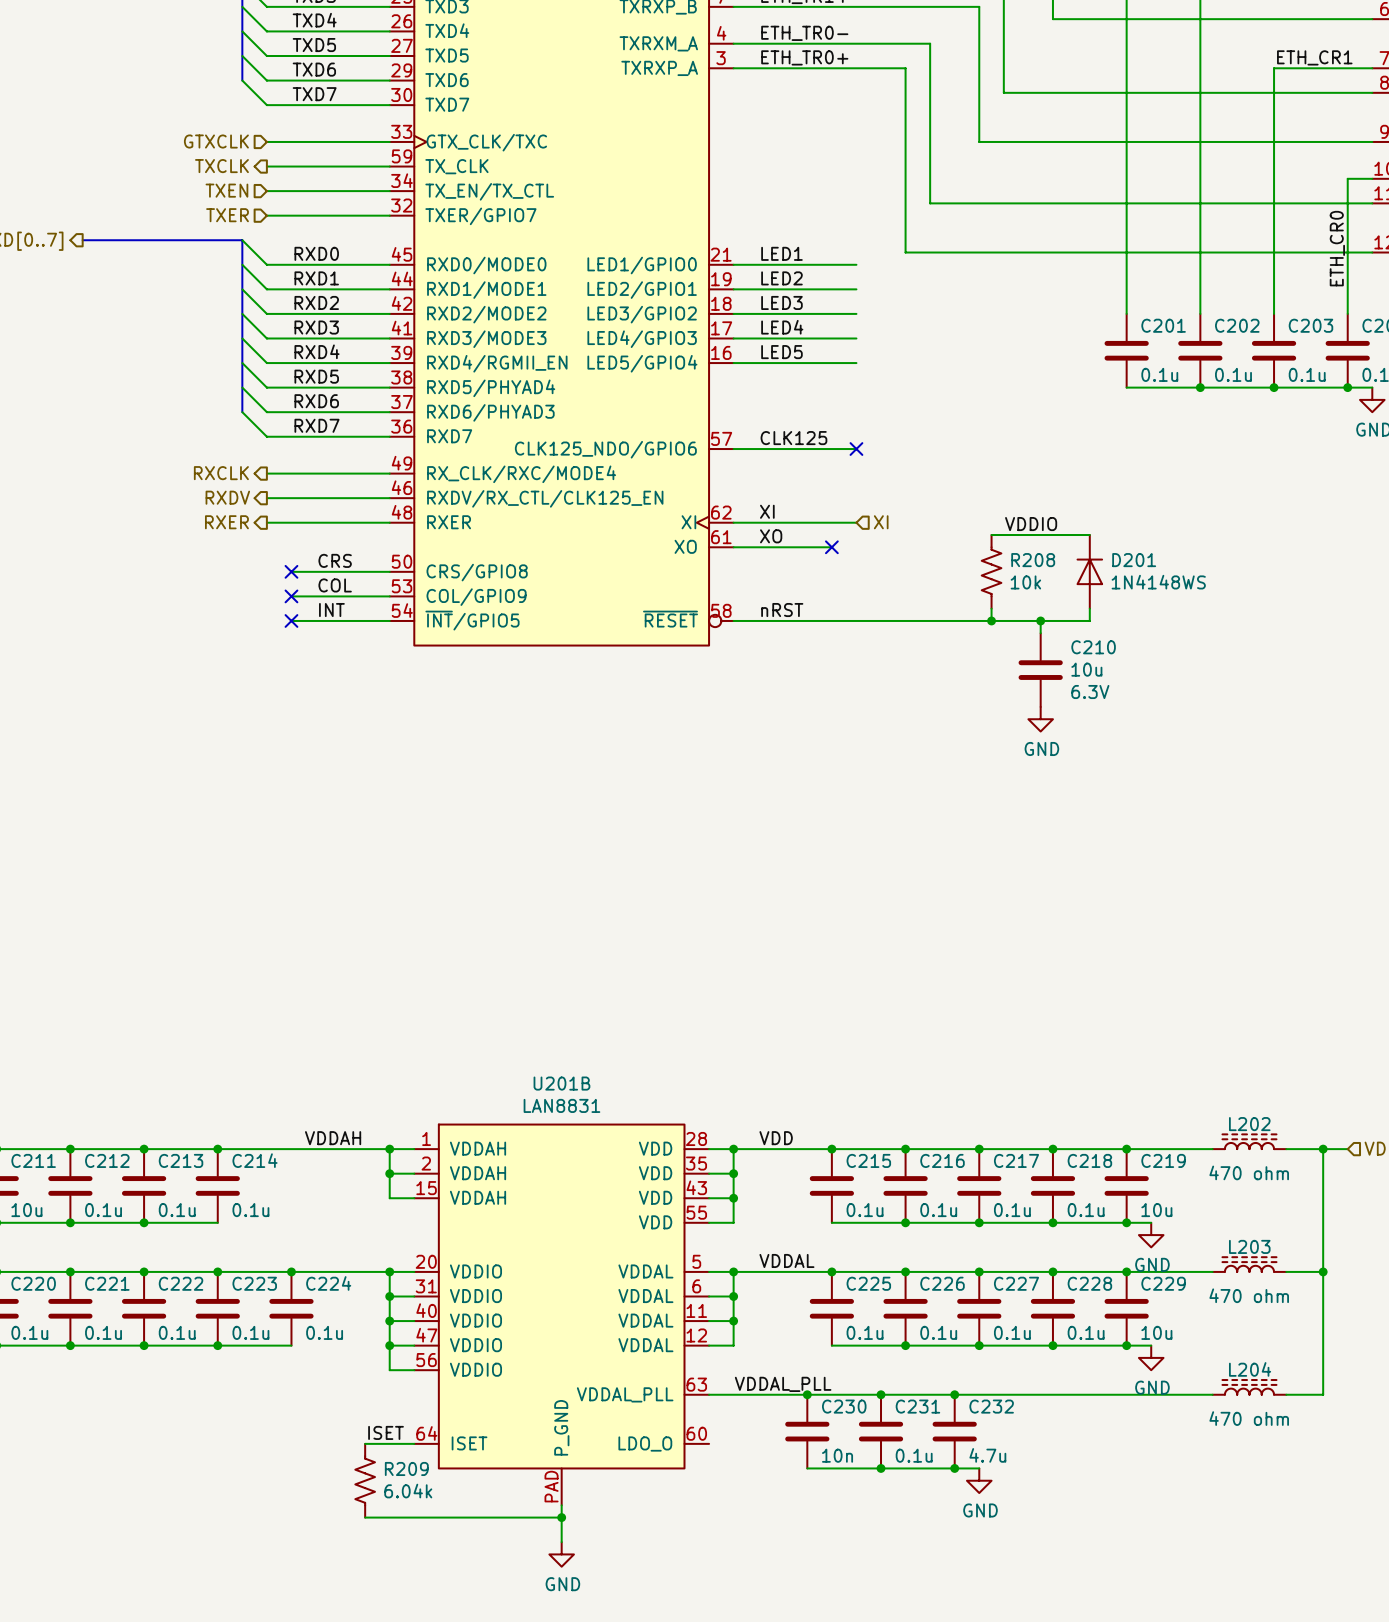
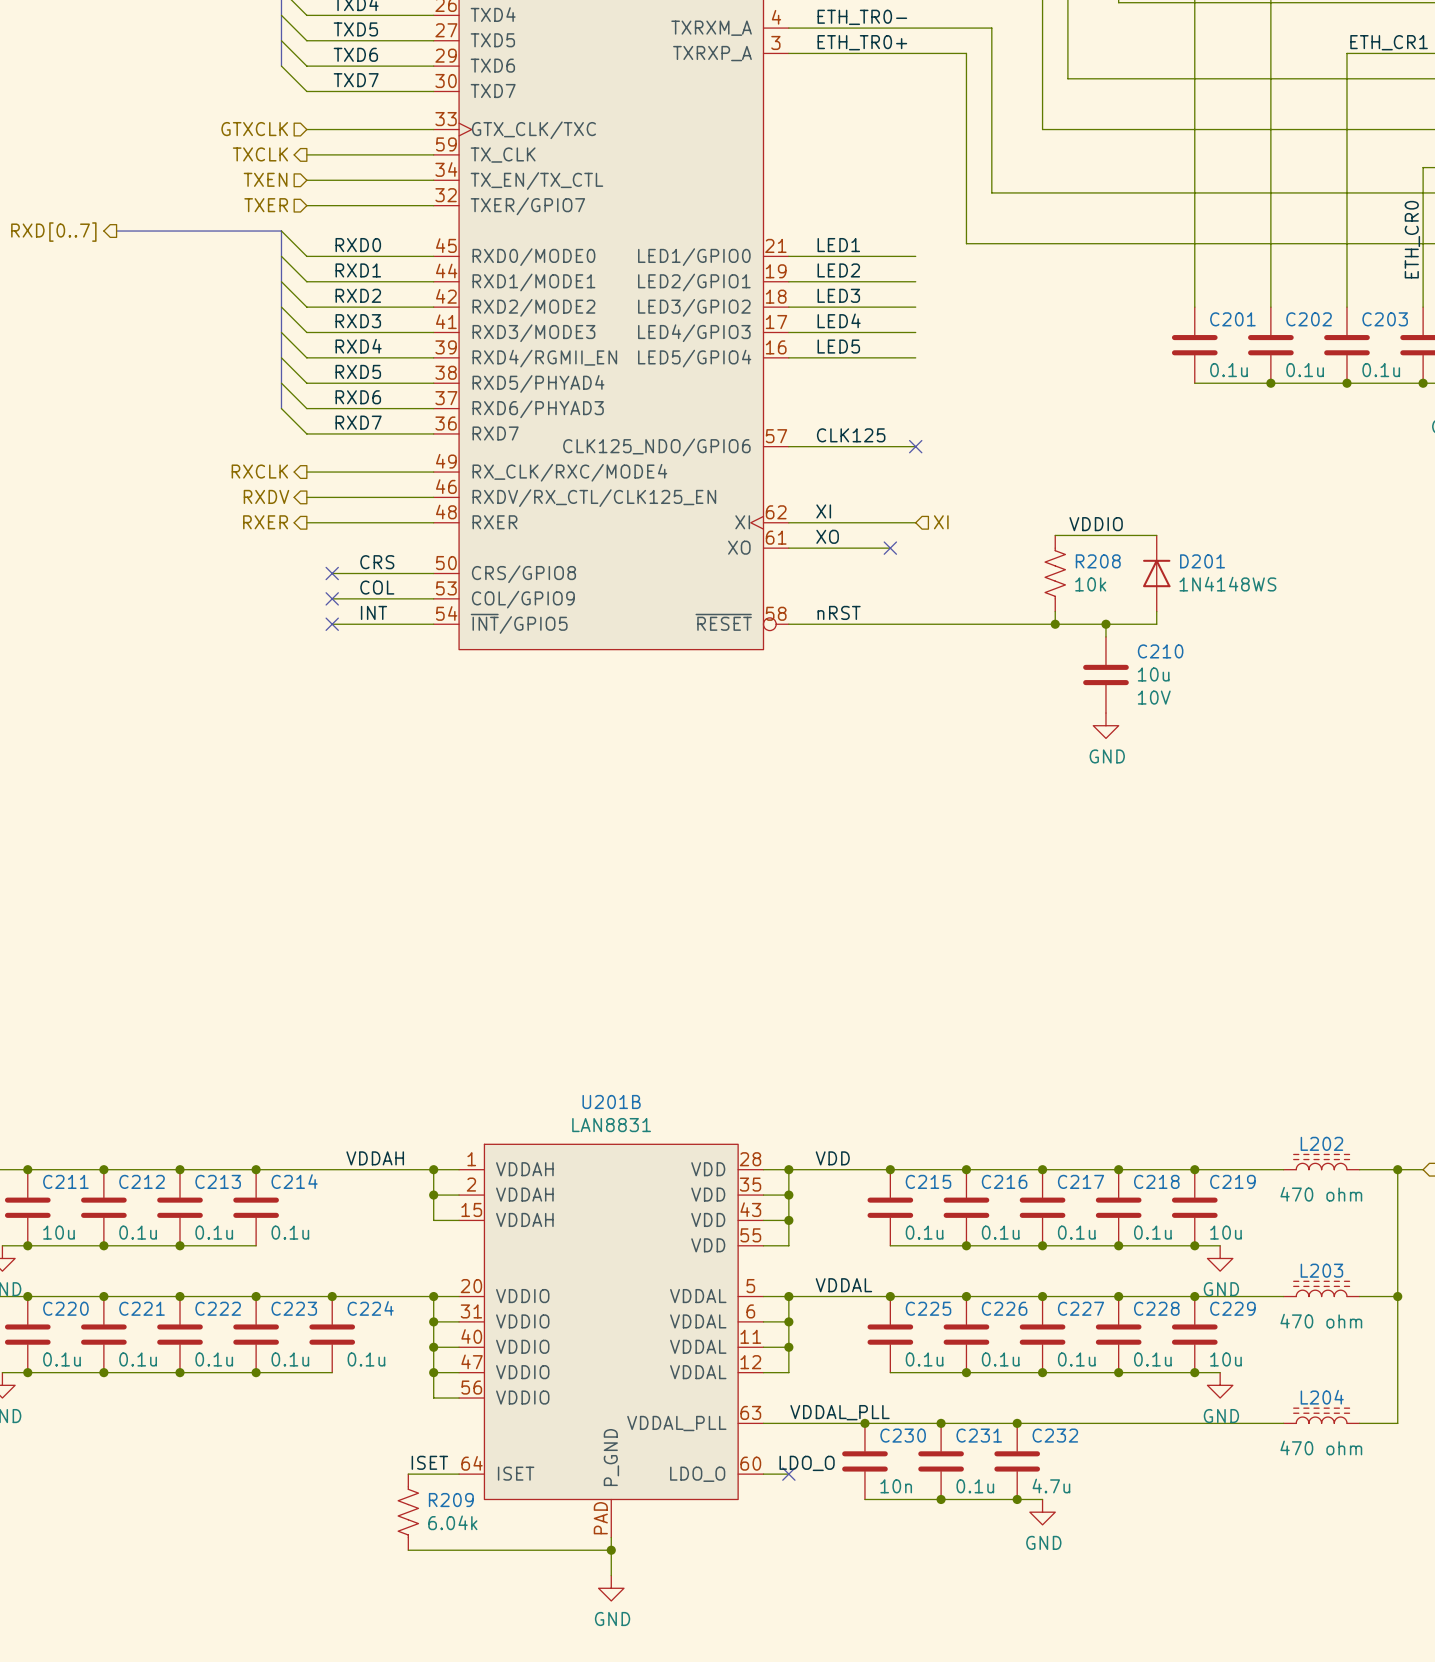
C210 text: 6.3V (1090, 692) -> 10V (1154, 697)
label: none -> LDO_O (807, 1463)
wire: none -> (763, 1474) (788, 1474)
no-connect mark: none -> (788, 1474)

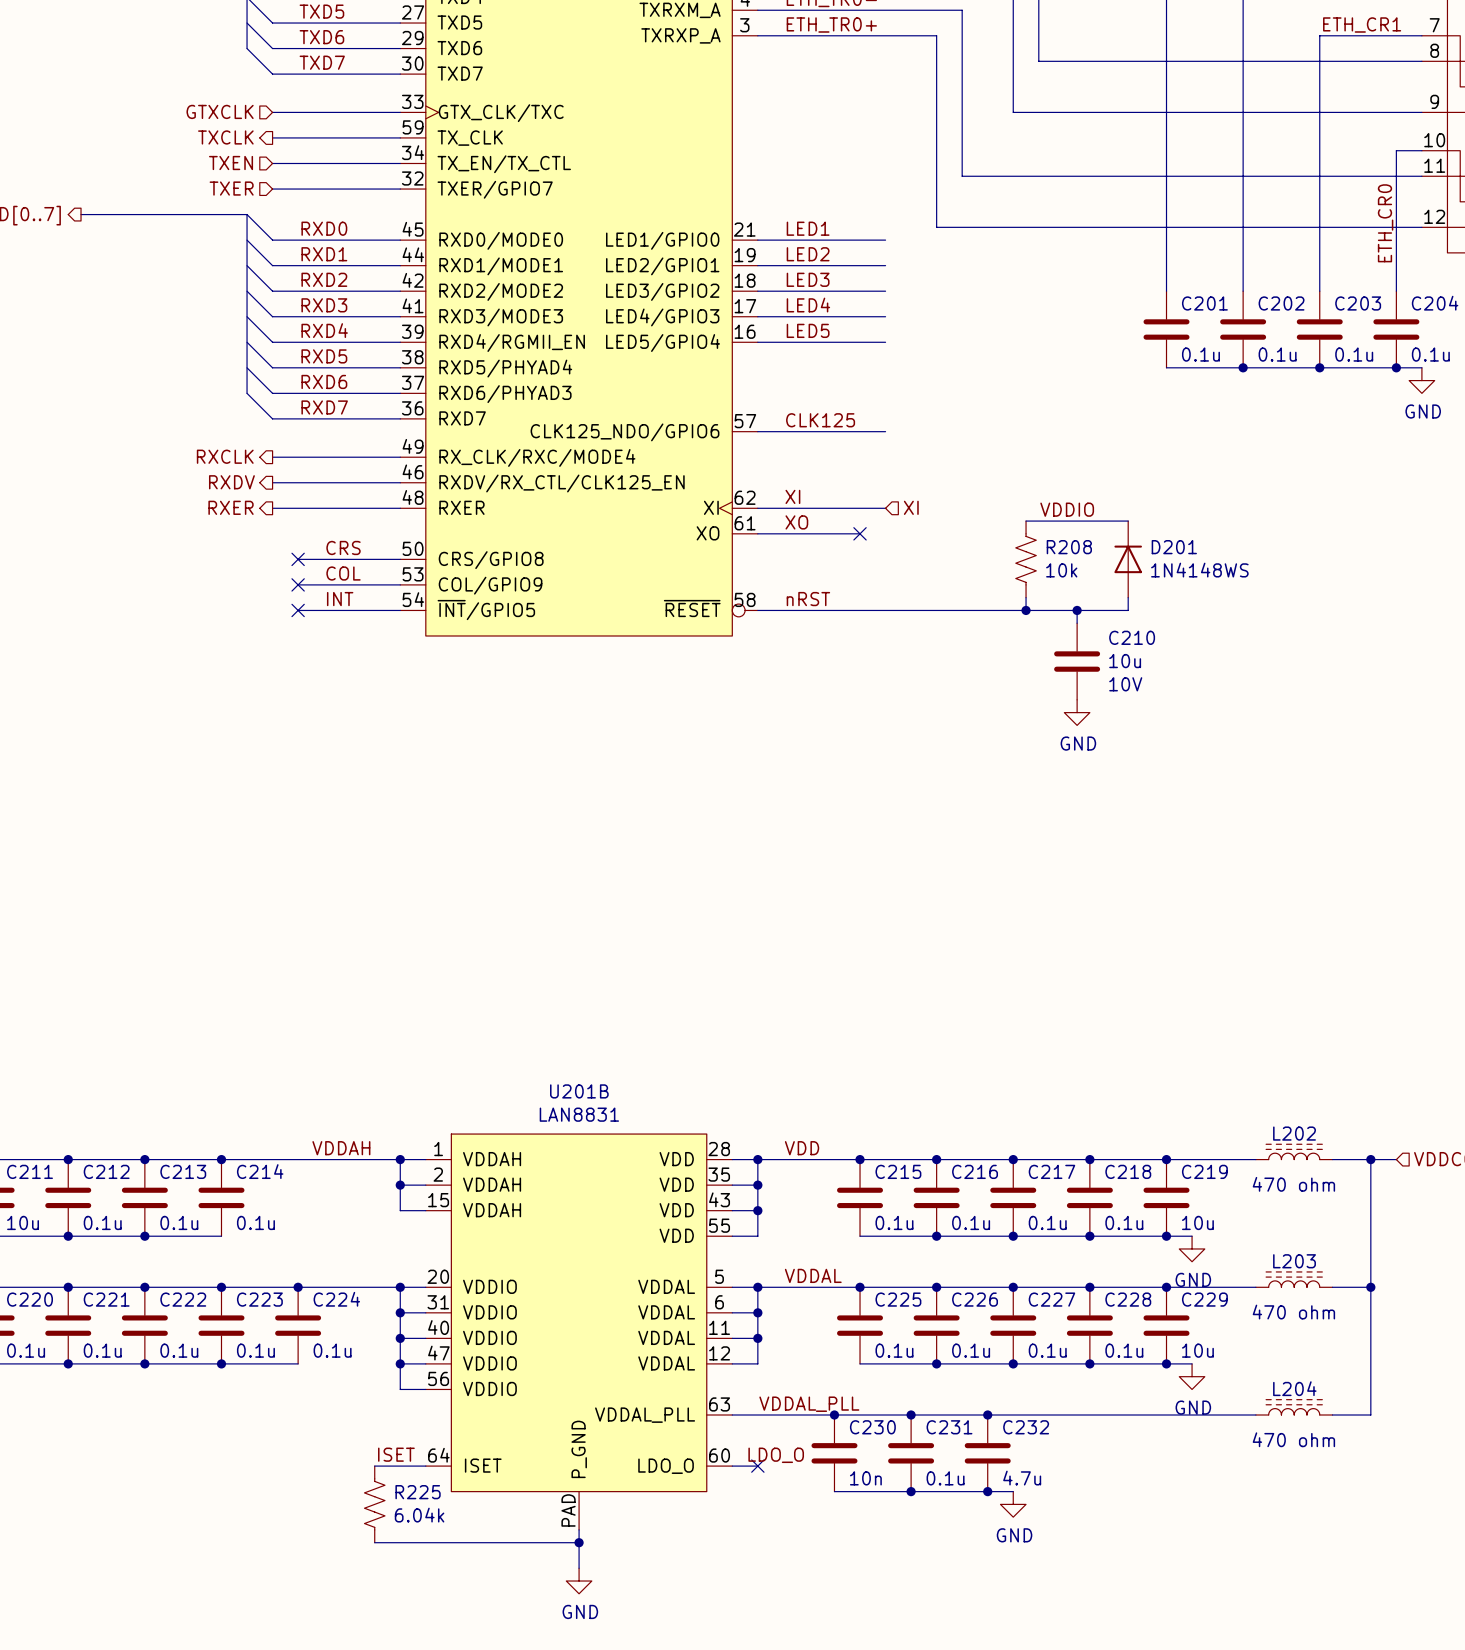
no-connect mark: (915, 446) -> none
R209 name: R209 (451, 1500) -> R225 (418, 1492)

